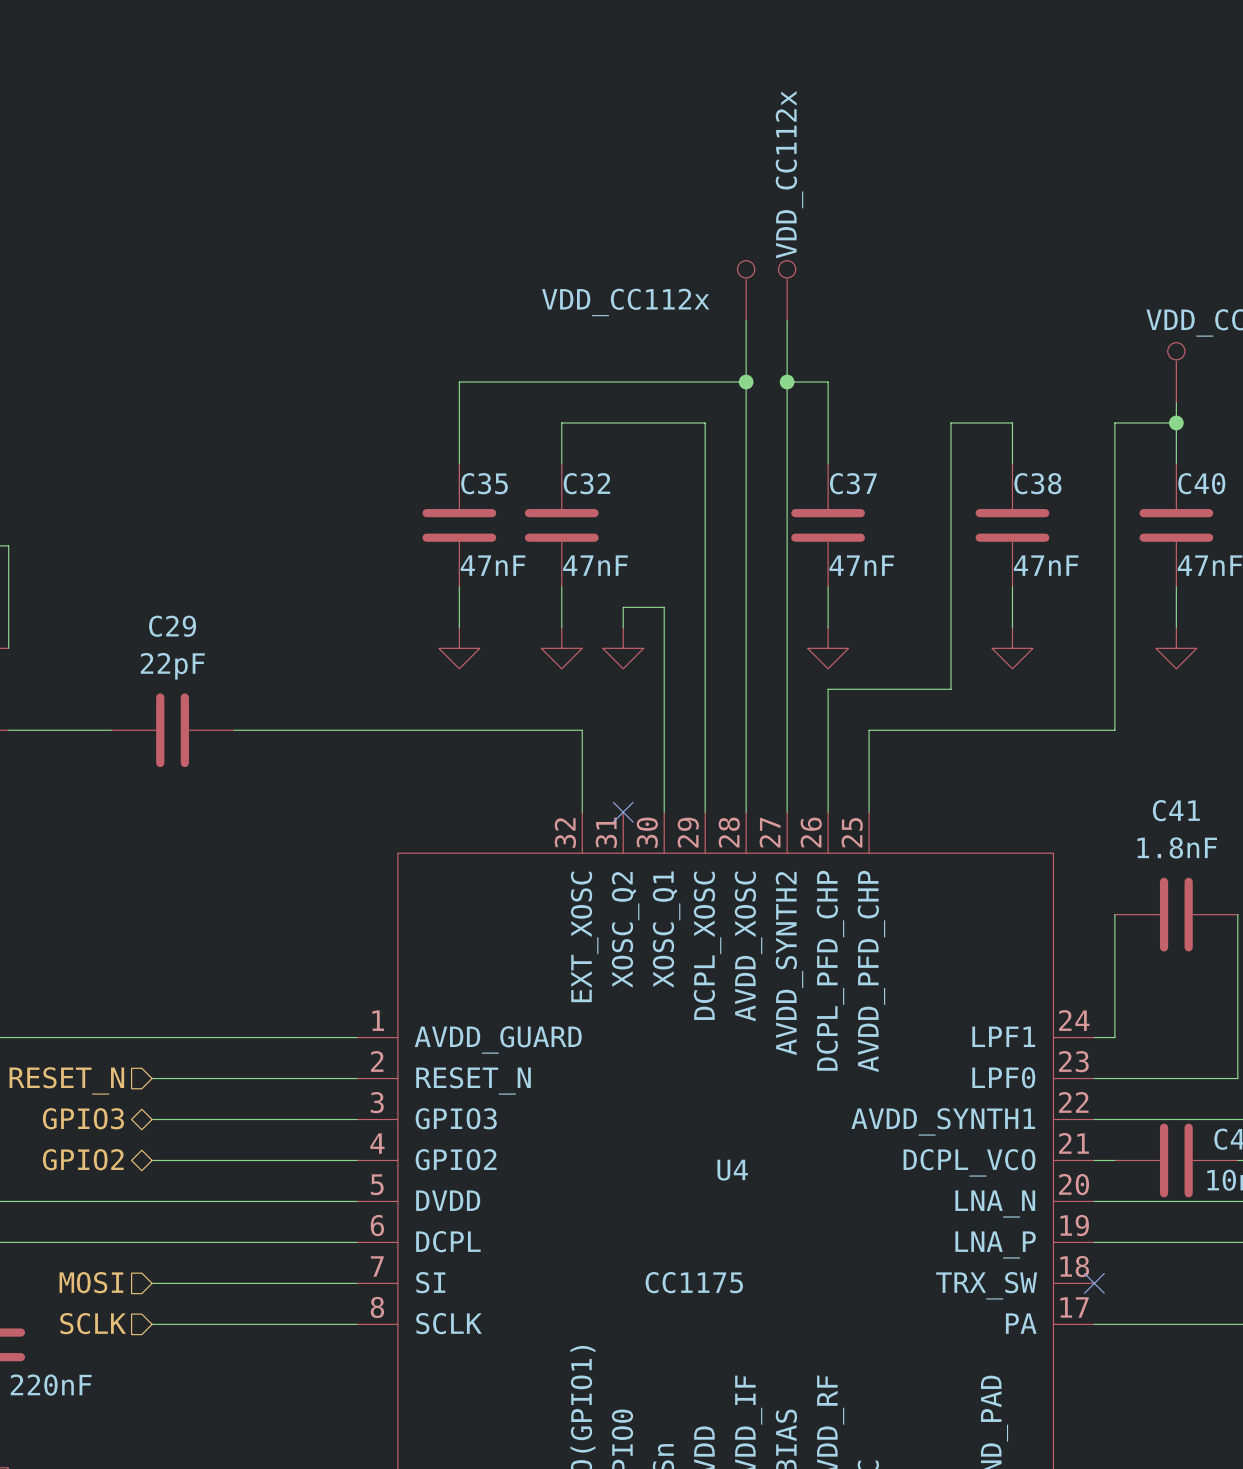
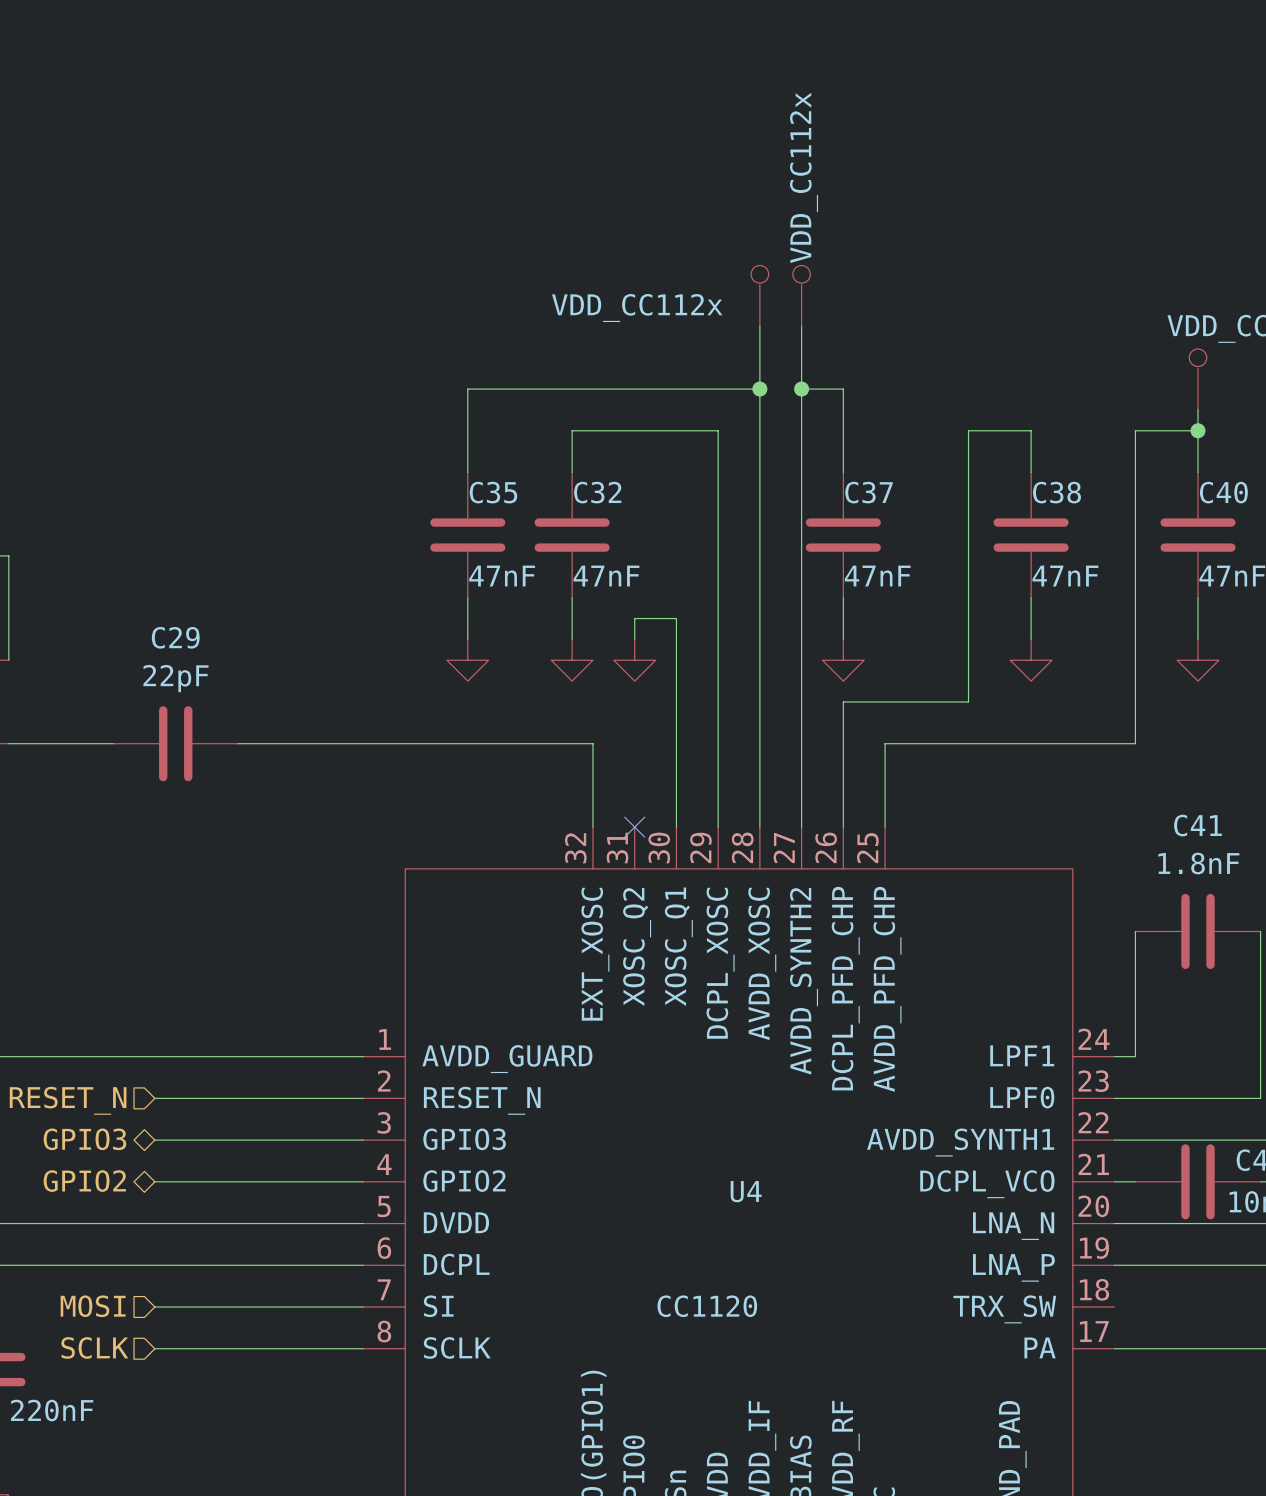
U4 value: CC1175 (694, 1282) -> CC1120 (707, 1306)
no-connect mark: (1094, 1283) -> none

